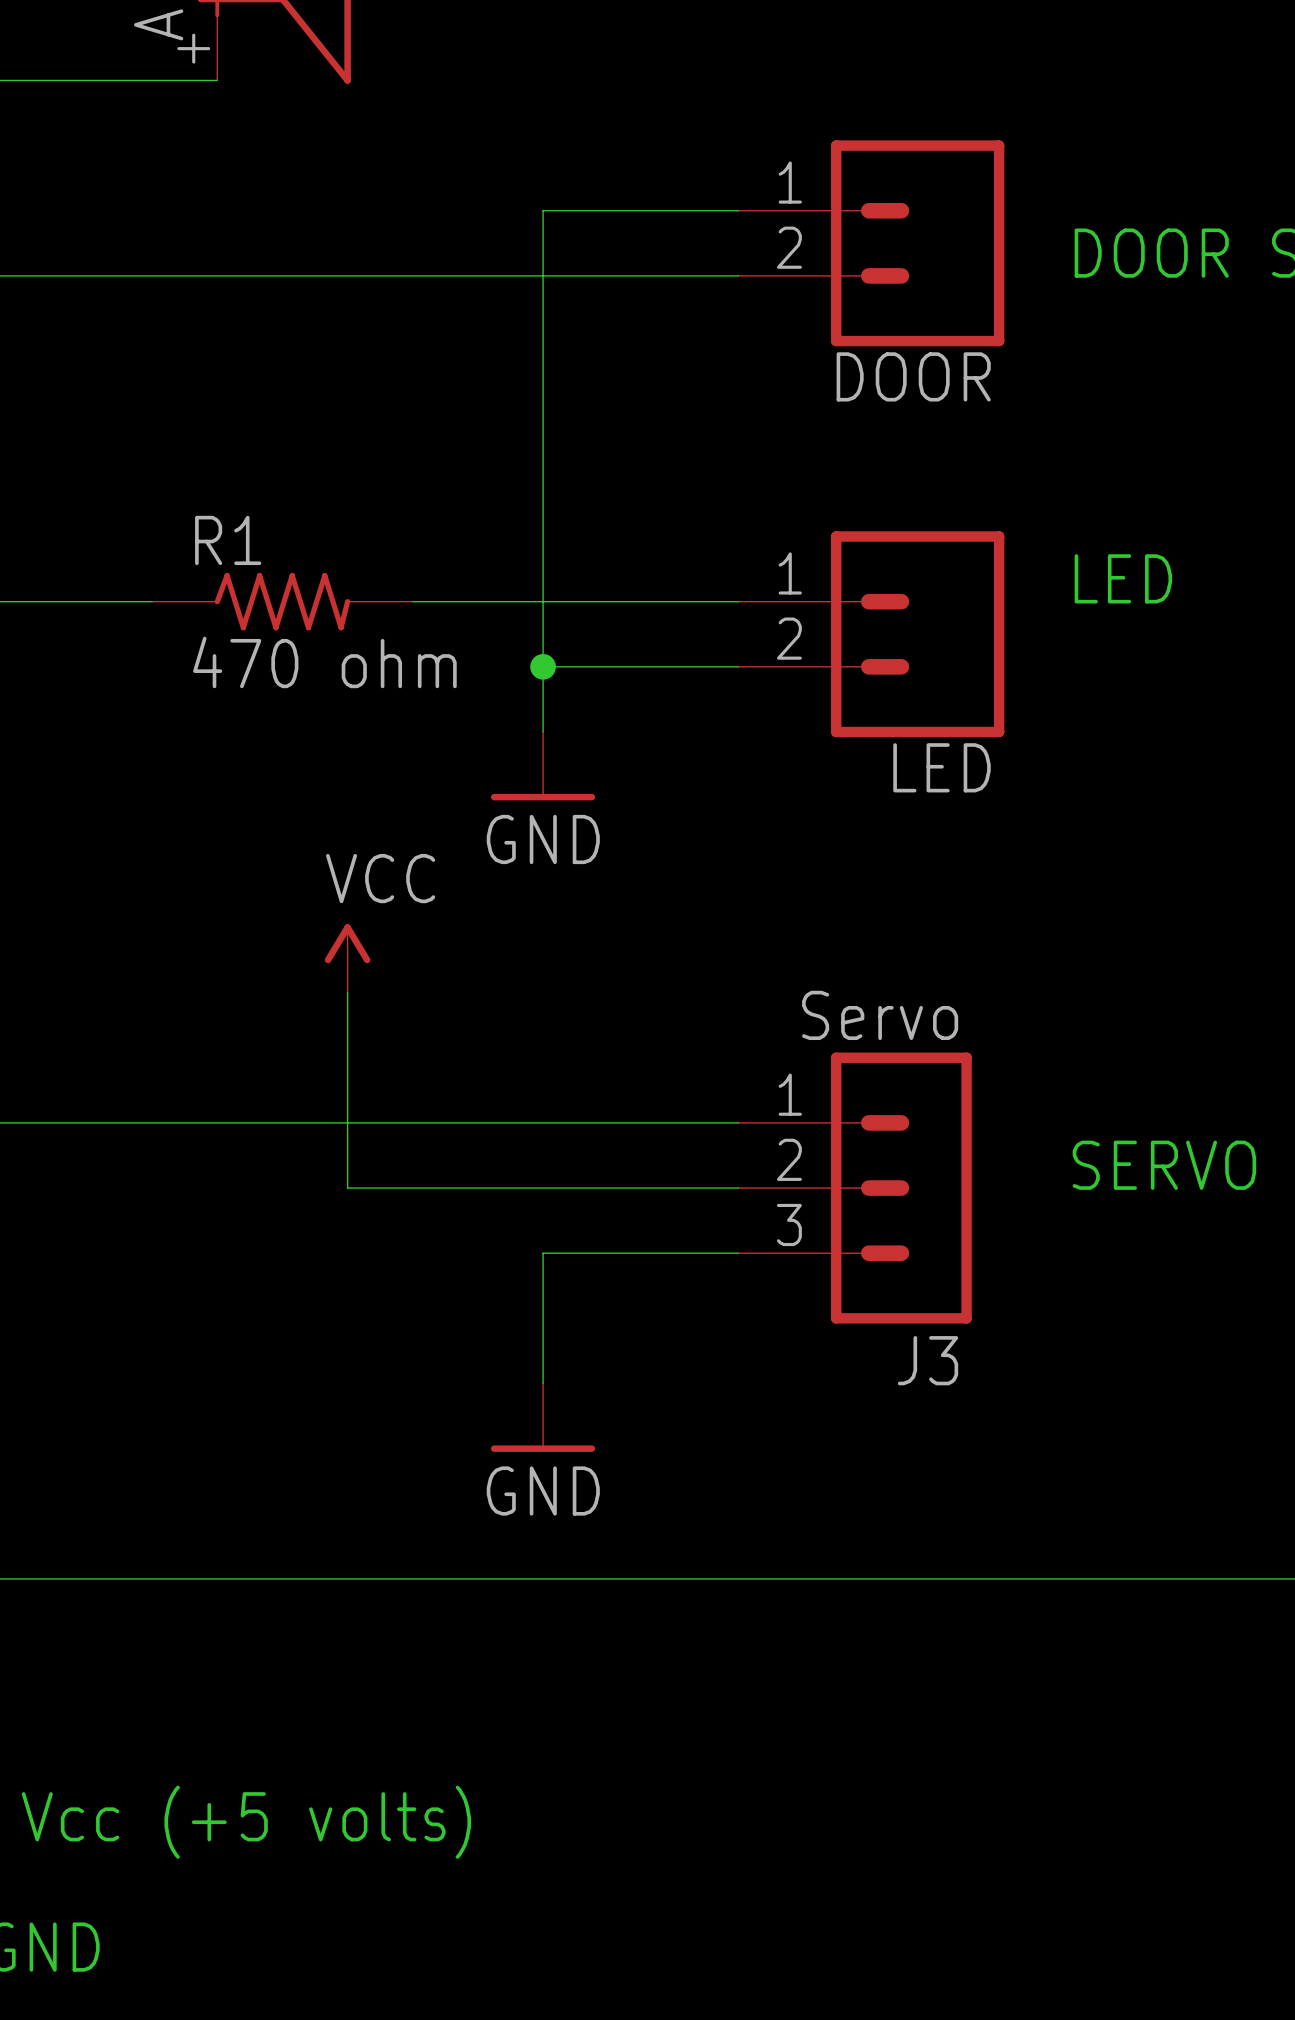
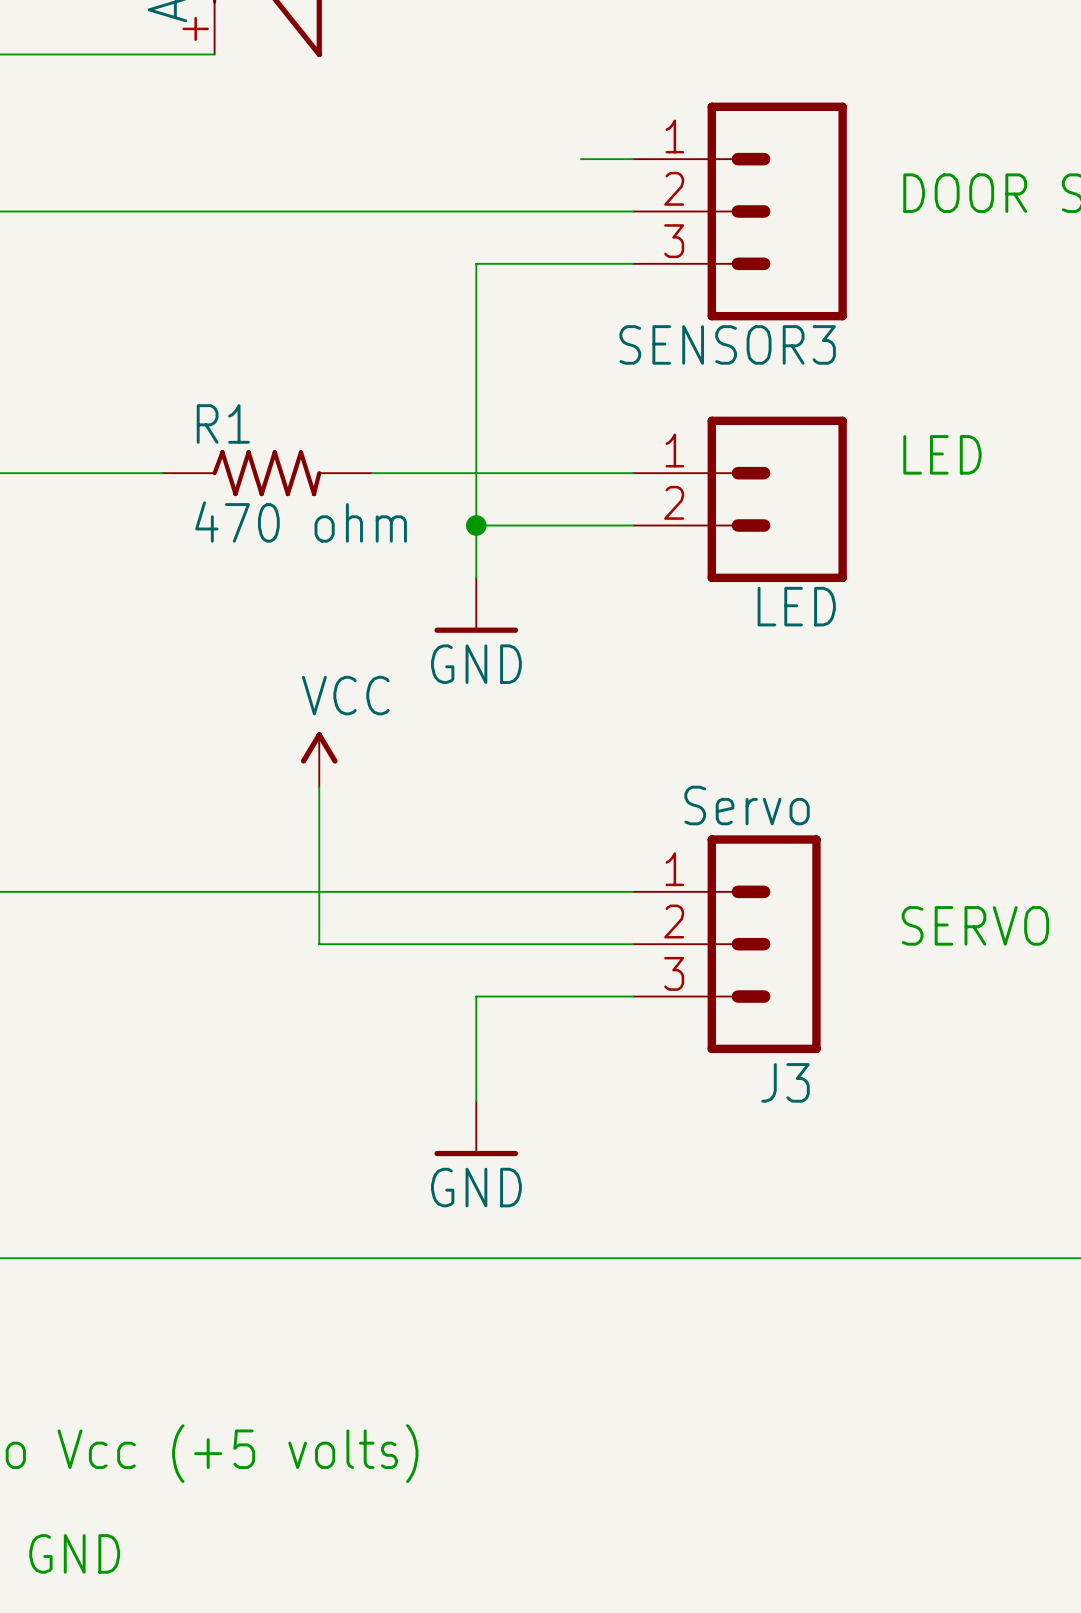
wire: (673, 210) (543, 210) (543, 341) -> (633, 263) (476, 263)
DOOR: (871, 243) -> none
SENSOR3: none -> (740, 211)

